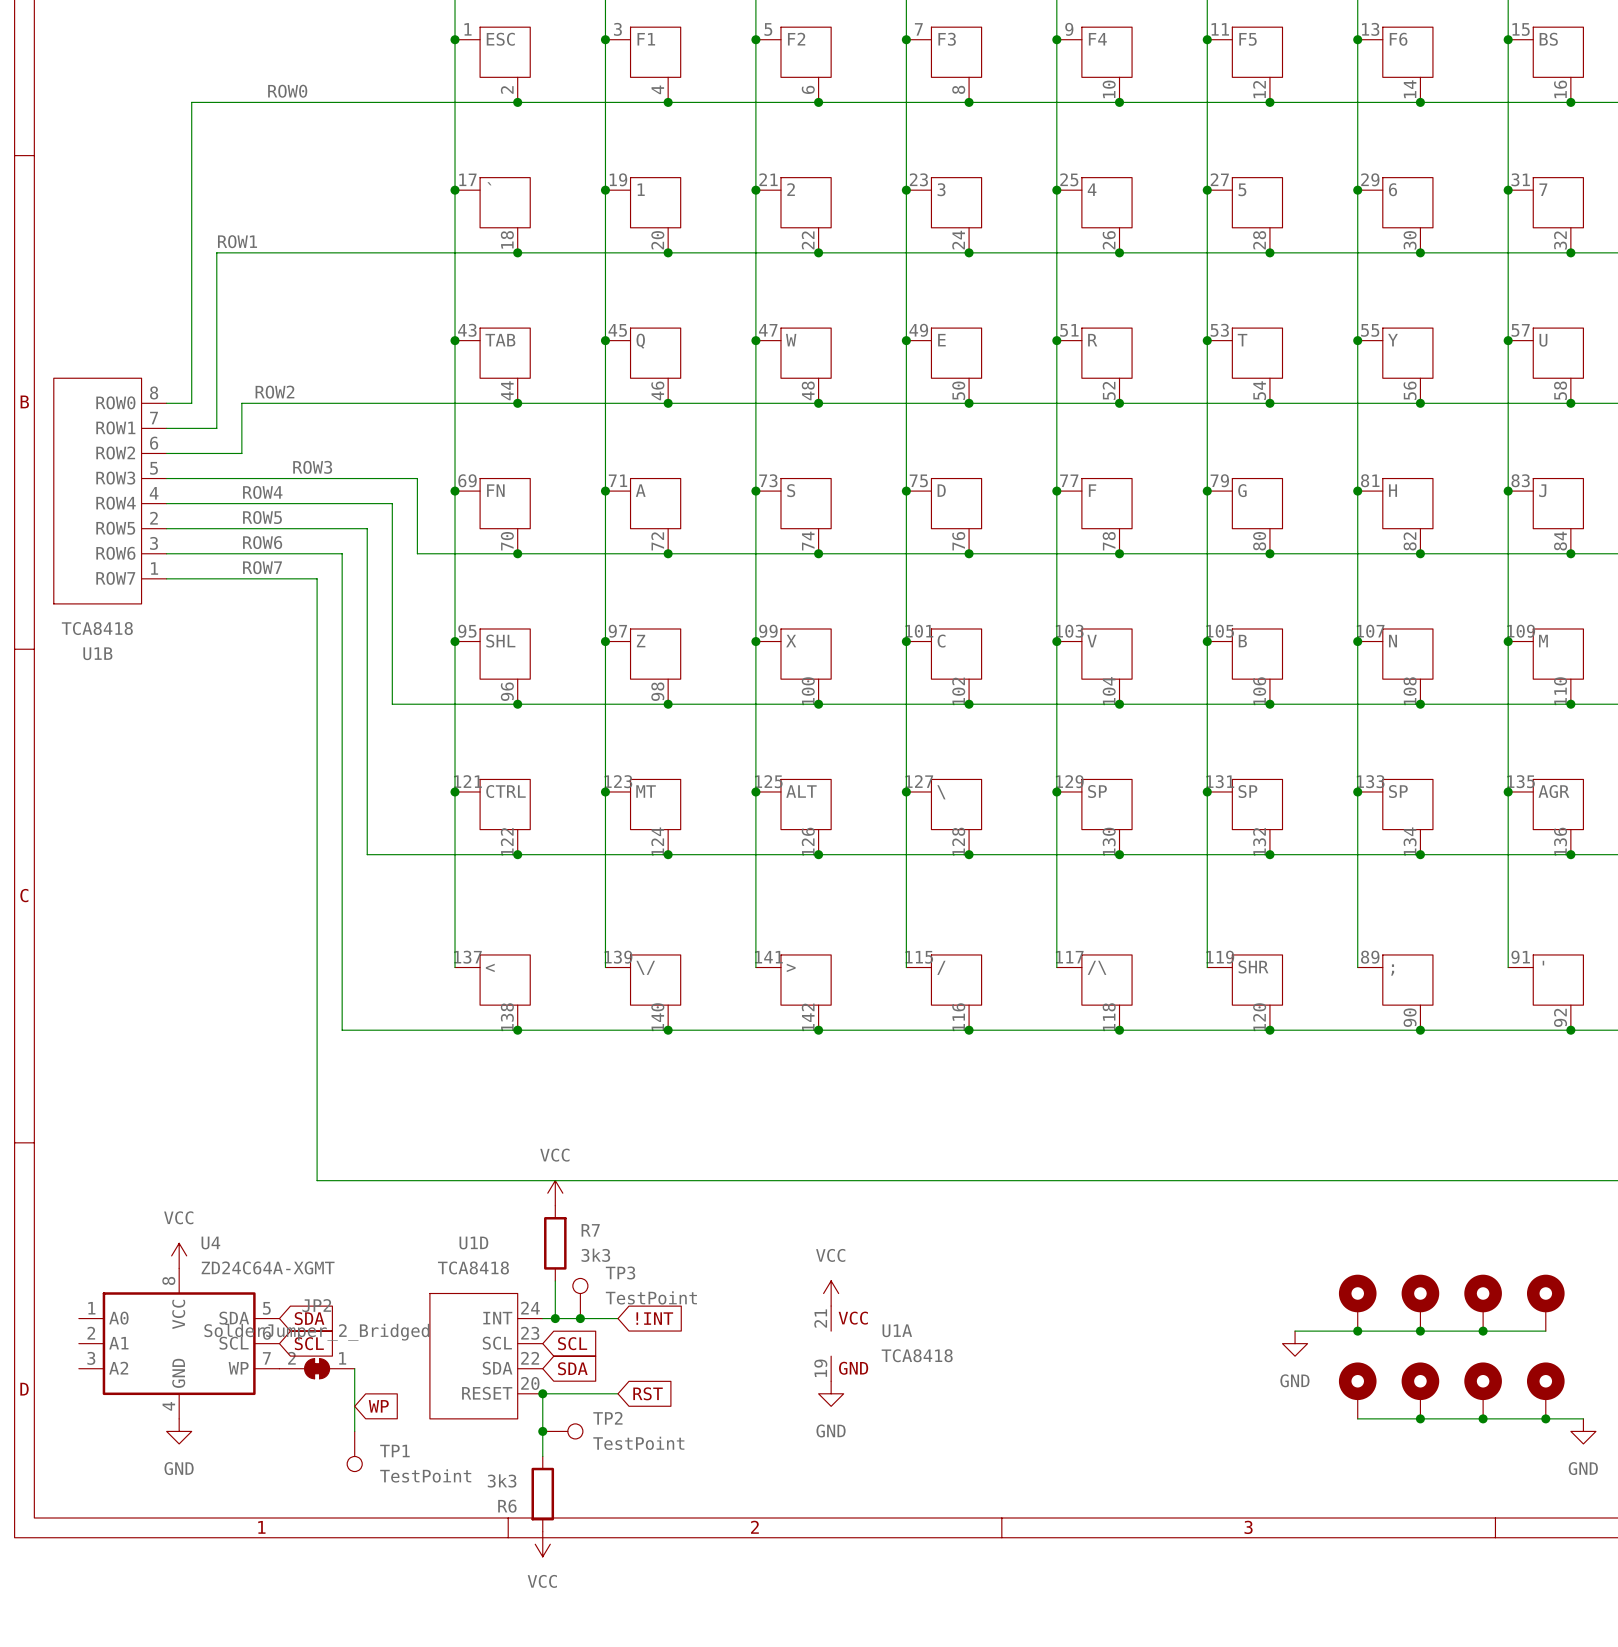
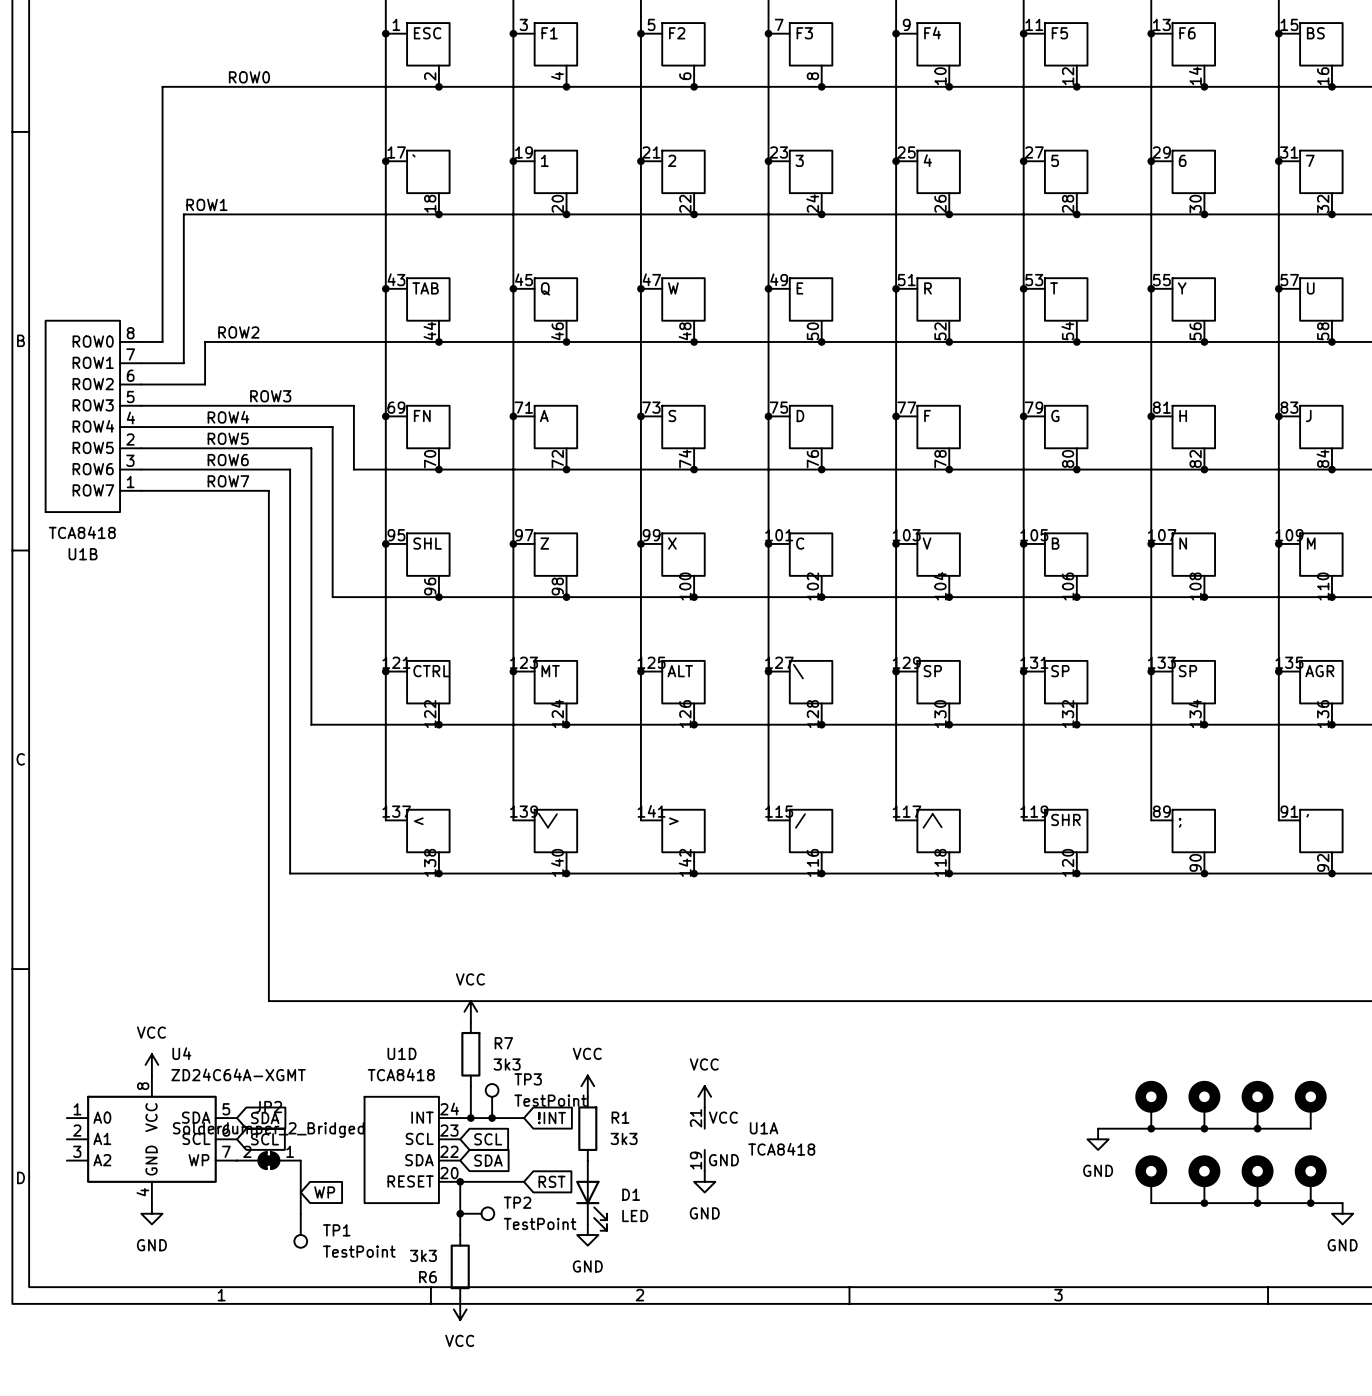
power symbol: none -> VCC (587, 1086)
R1: none -> 3k3 (587, 1128)
D1: none -> LED (591, 1195)
power symbol: none -> GND (587, 1235)

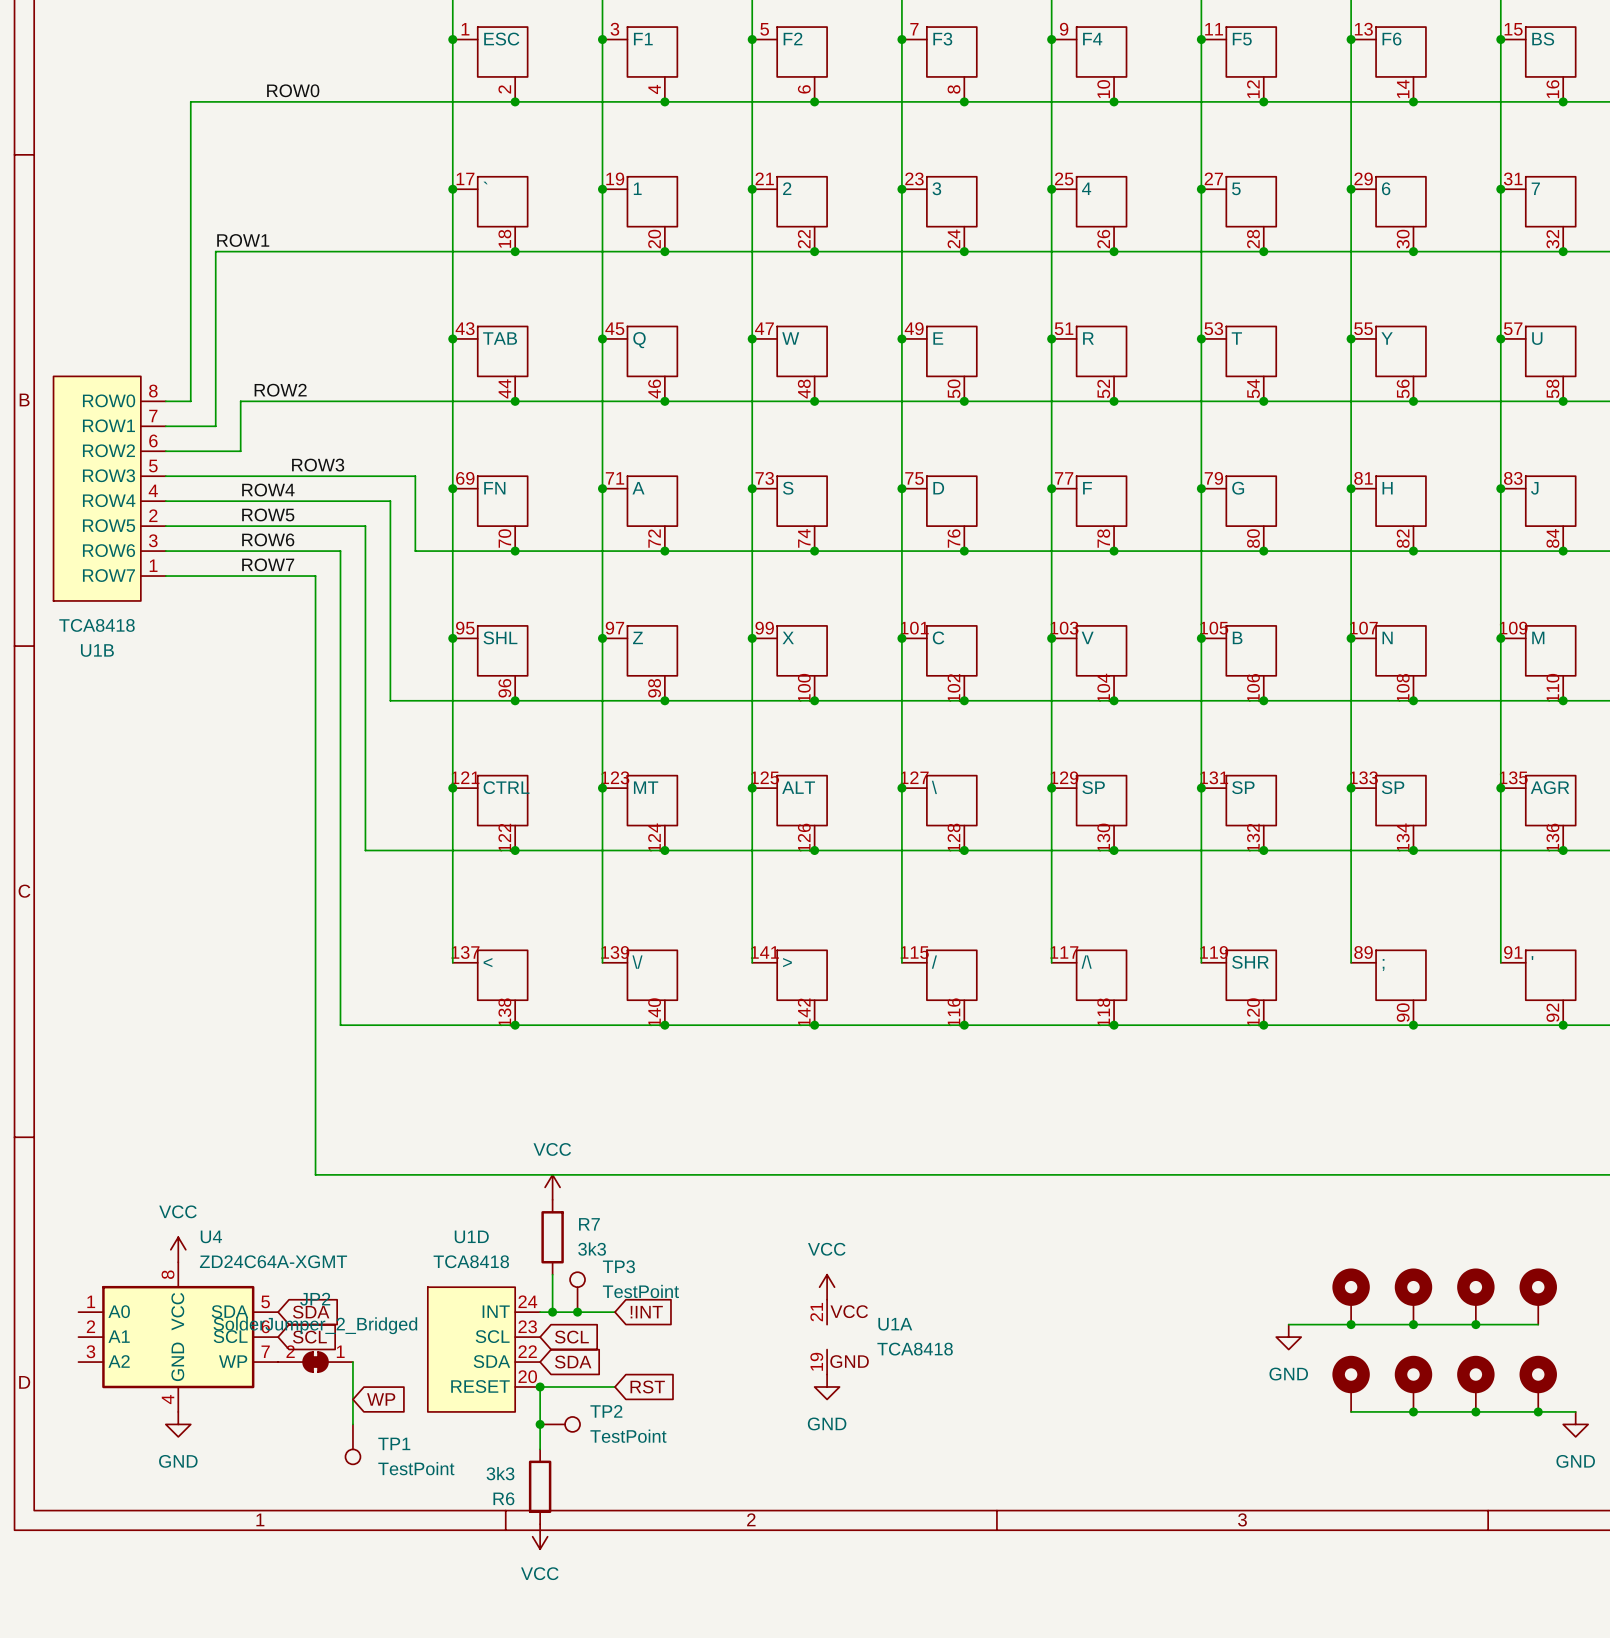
power symbol: VCC (587, 1086) -> none
R1: 3k3 (587, 1128) -> none
D1: LED (591, 1195) -> none
power symbol: GND (587, 1235) -> none

